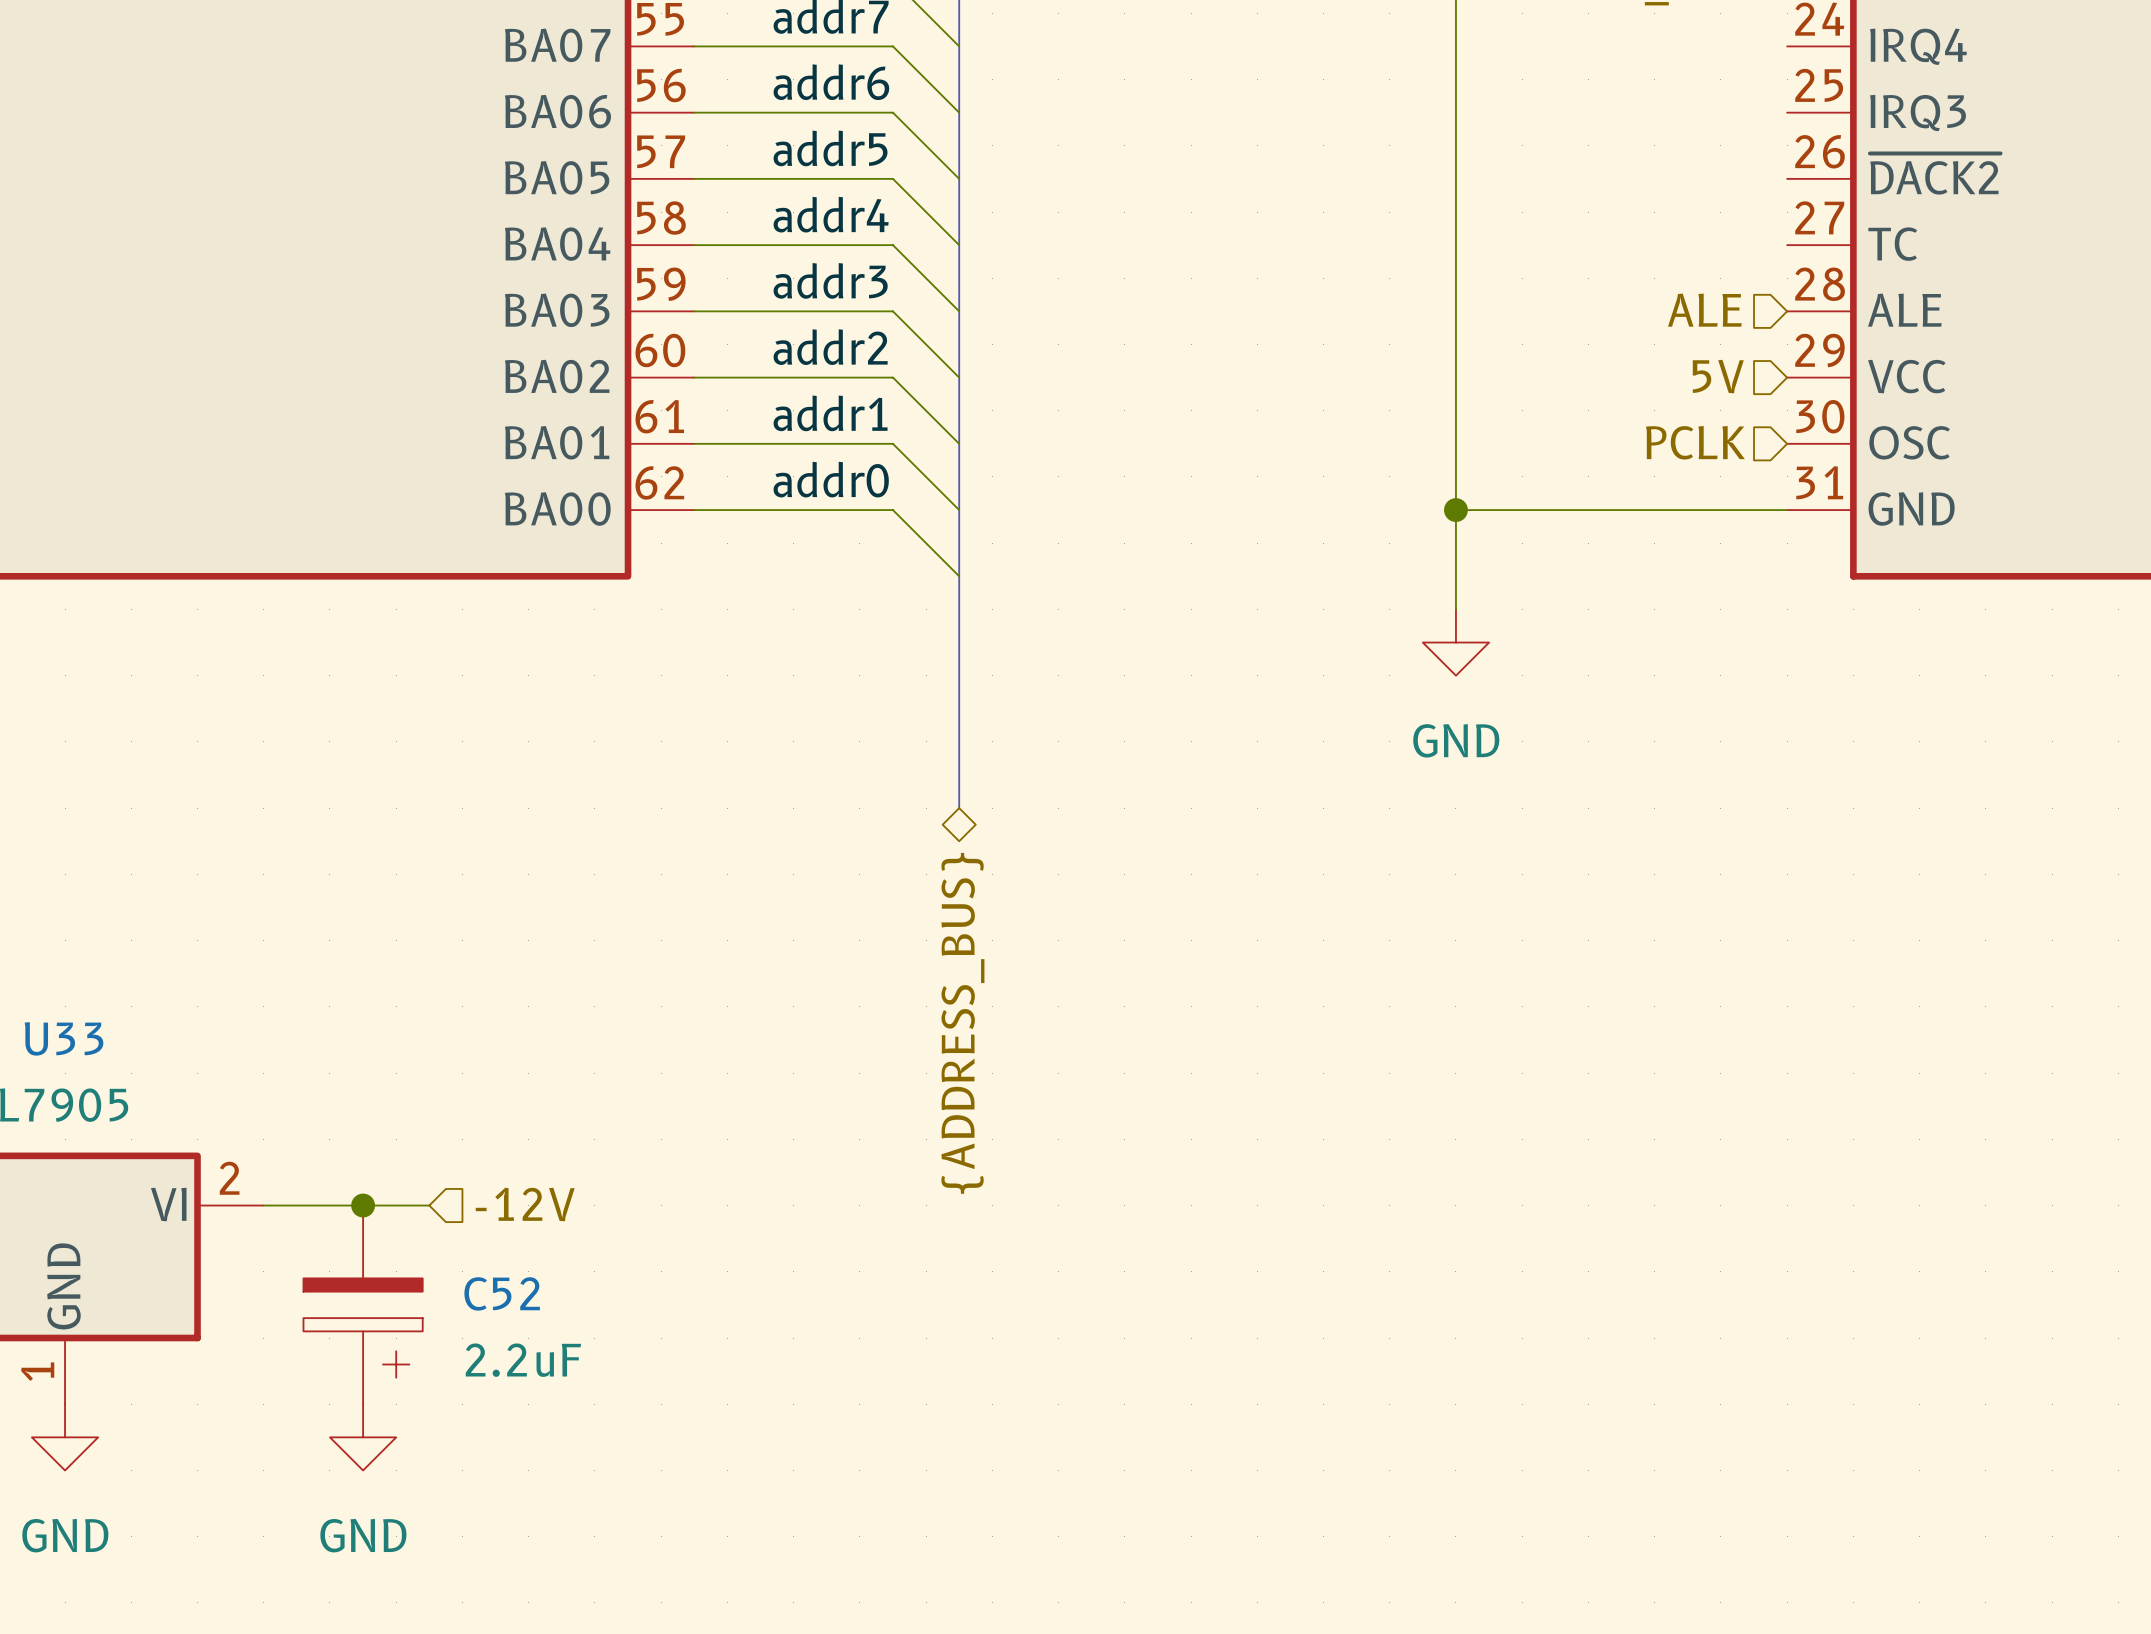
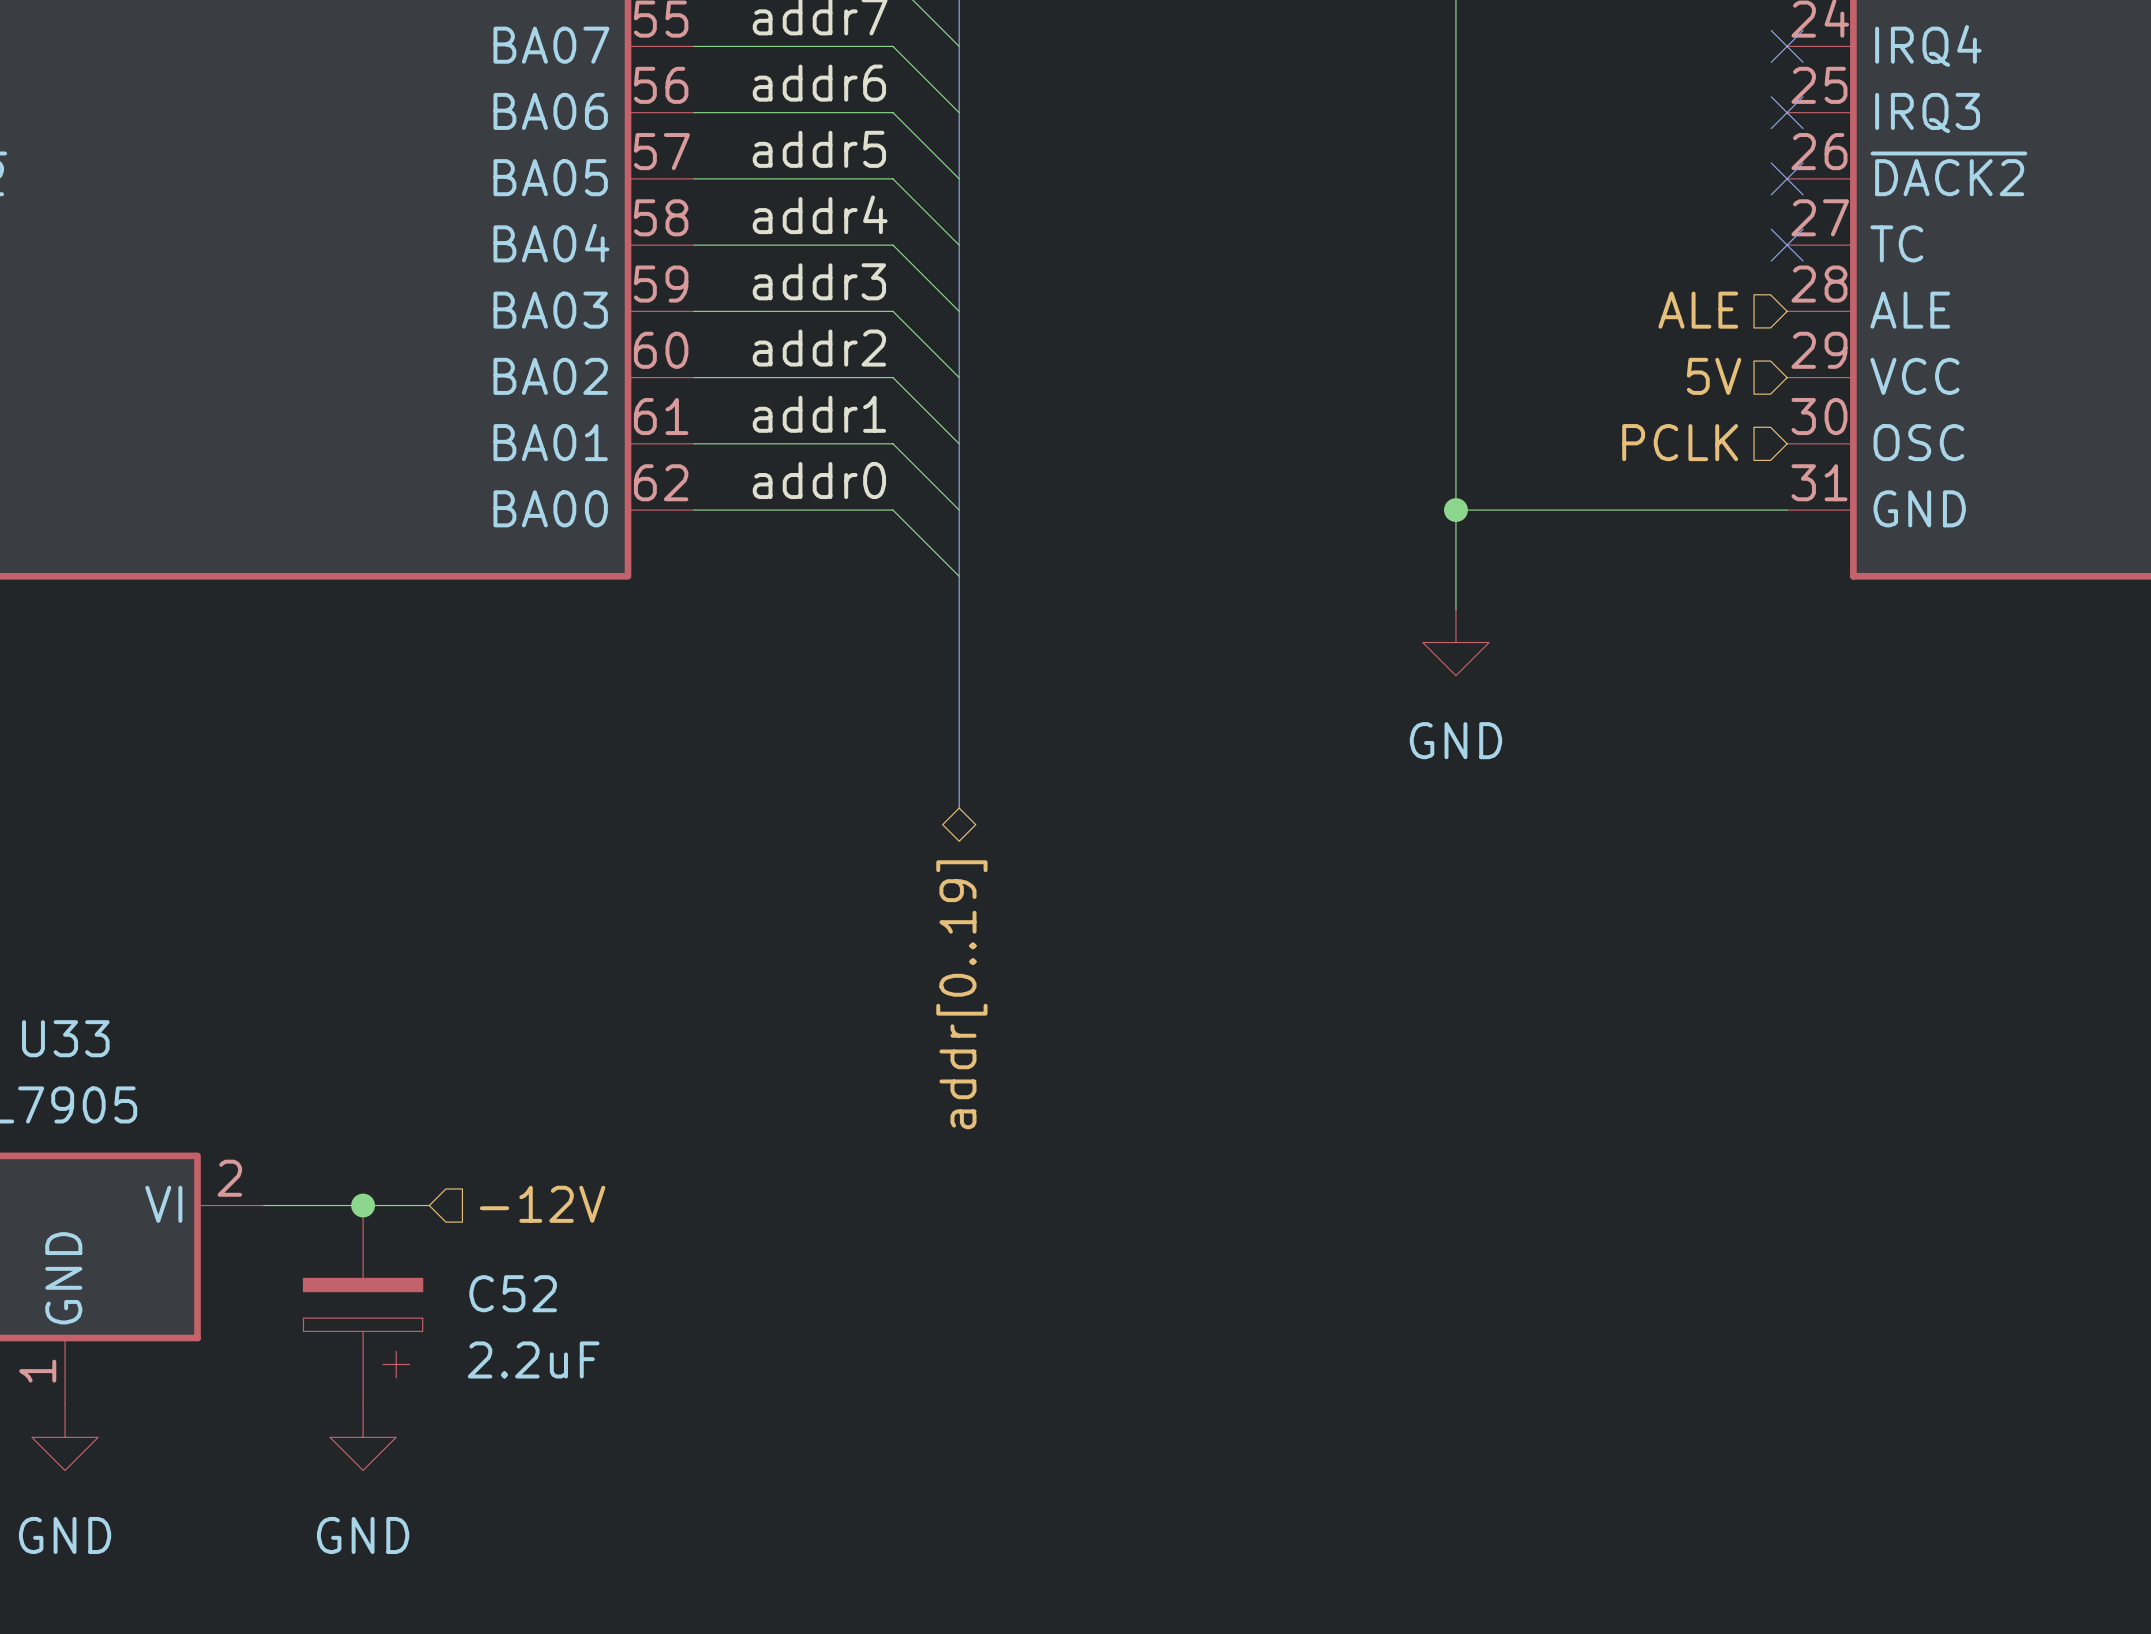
no-connect mark: none -> (1787, 46)
no-connect mark: none -> (1787, 112)
no-connect mark: none -> (1787, 178)
no-connect mark: none -> (1787, 245)
hierarchical label: {ADDRESS_BUS} (962, 1023) -> addr[0..19] (961, 994)

